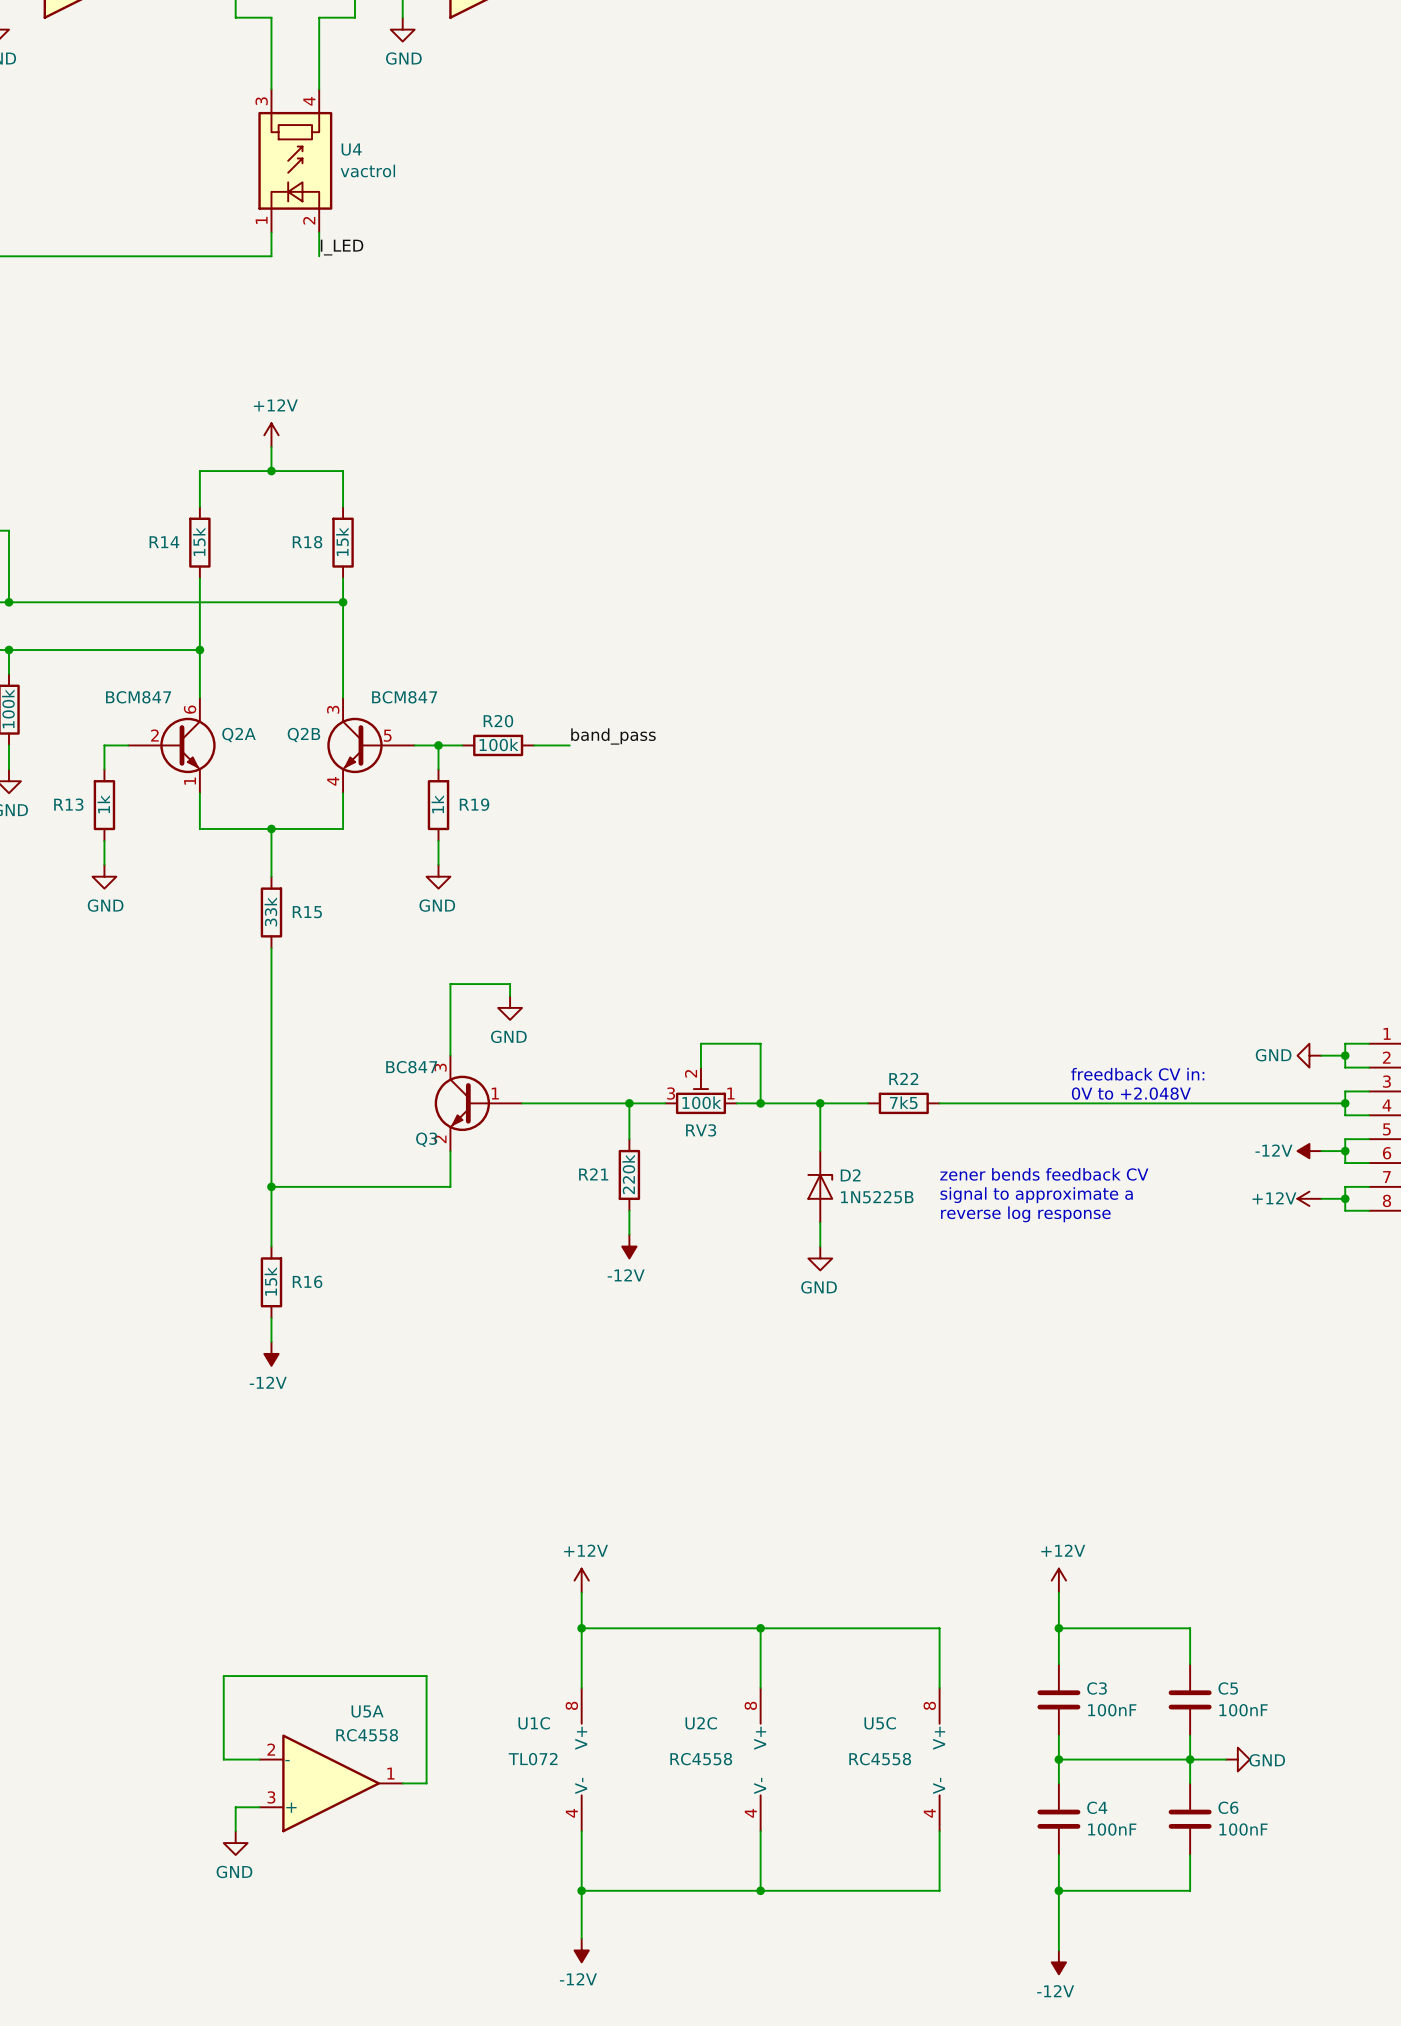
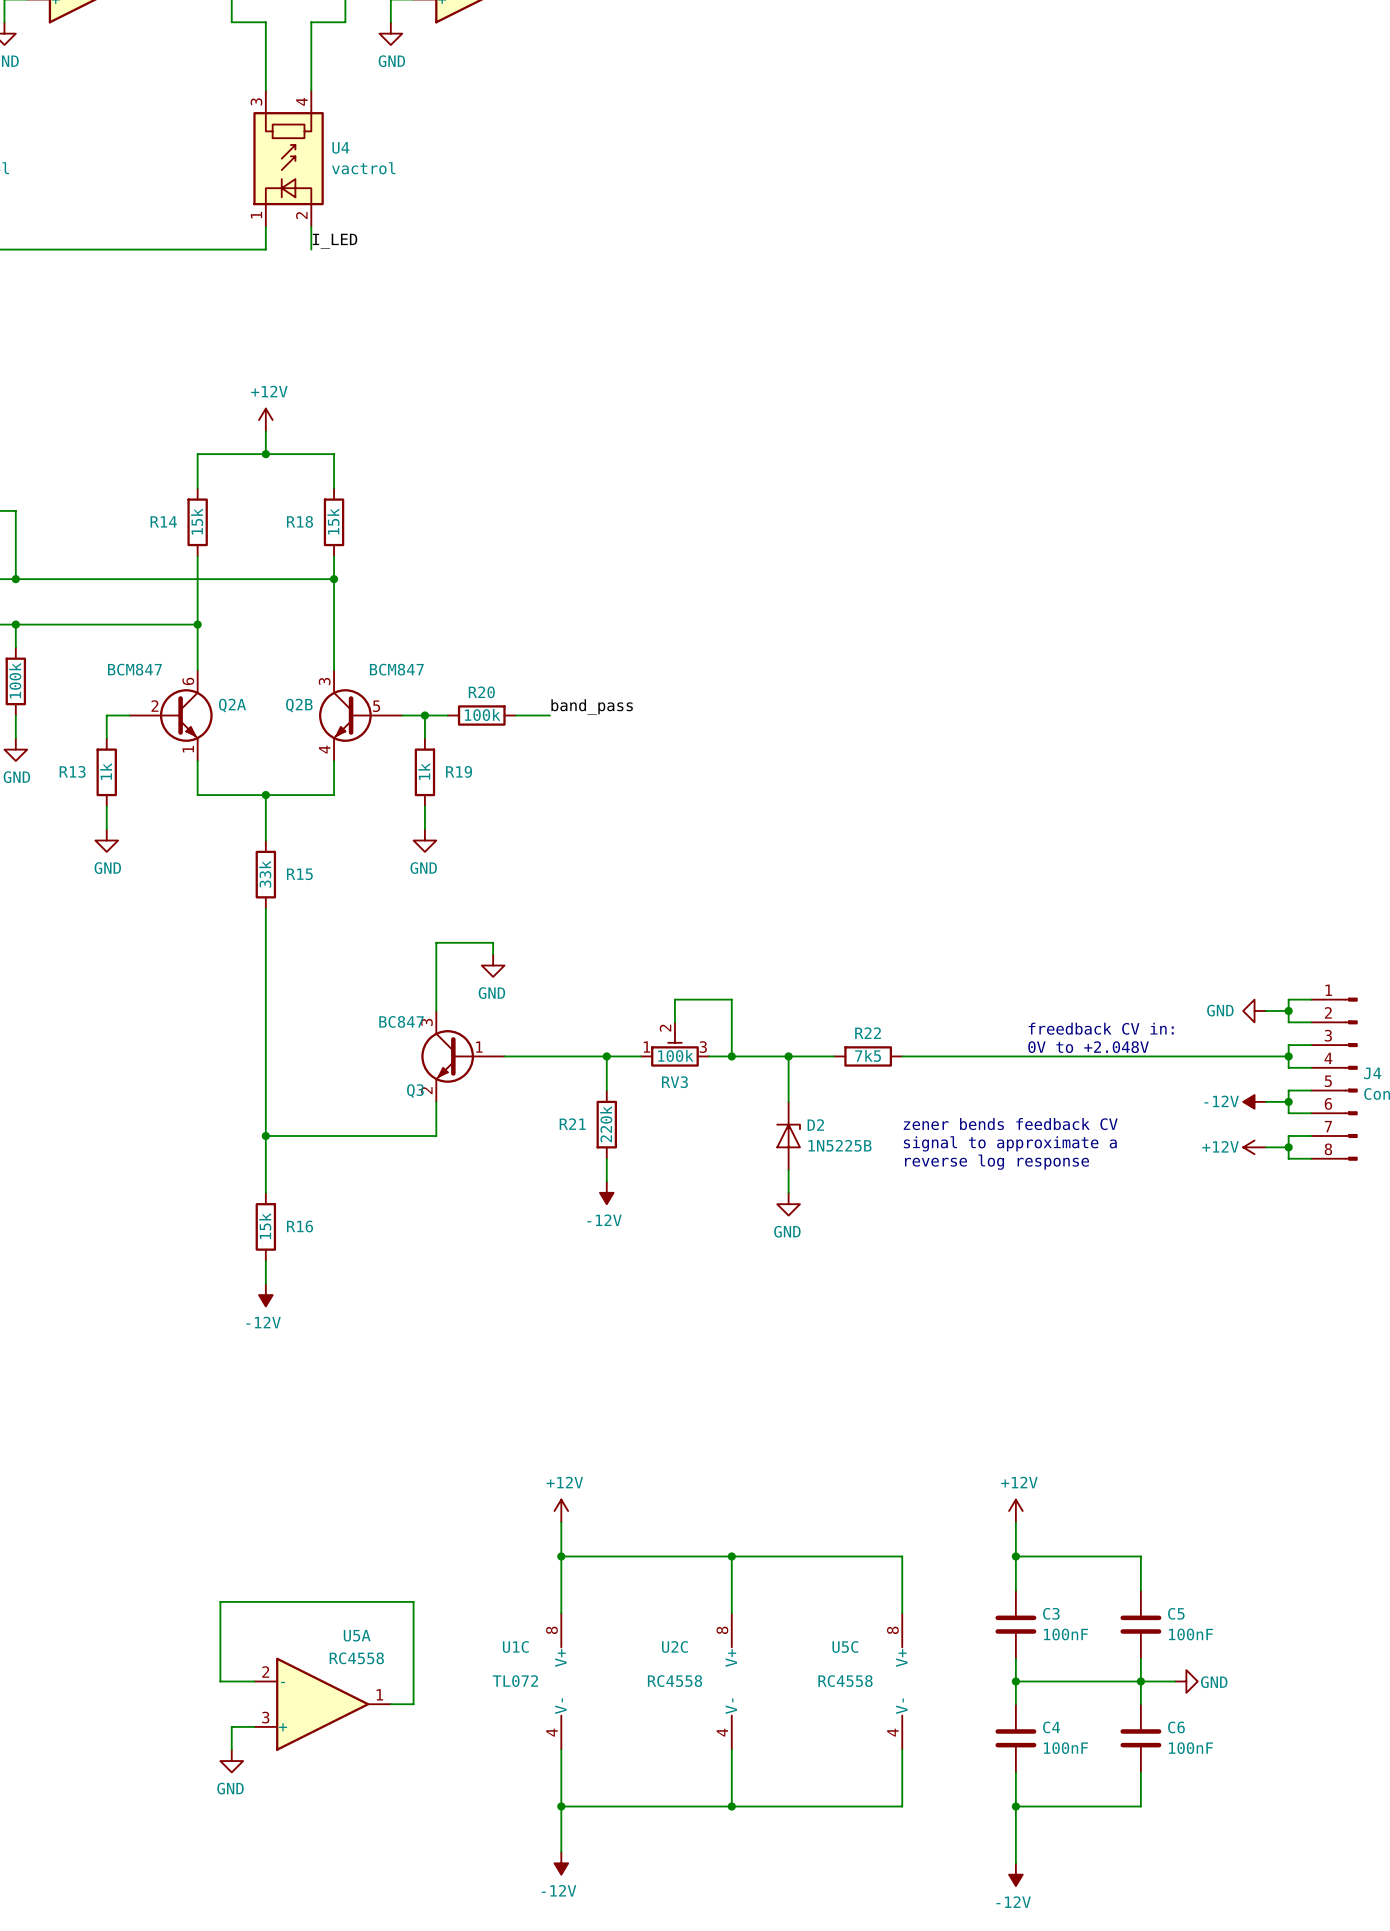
RV3 flip: as is (700, 1096) -> left-right (674, 1050)

